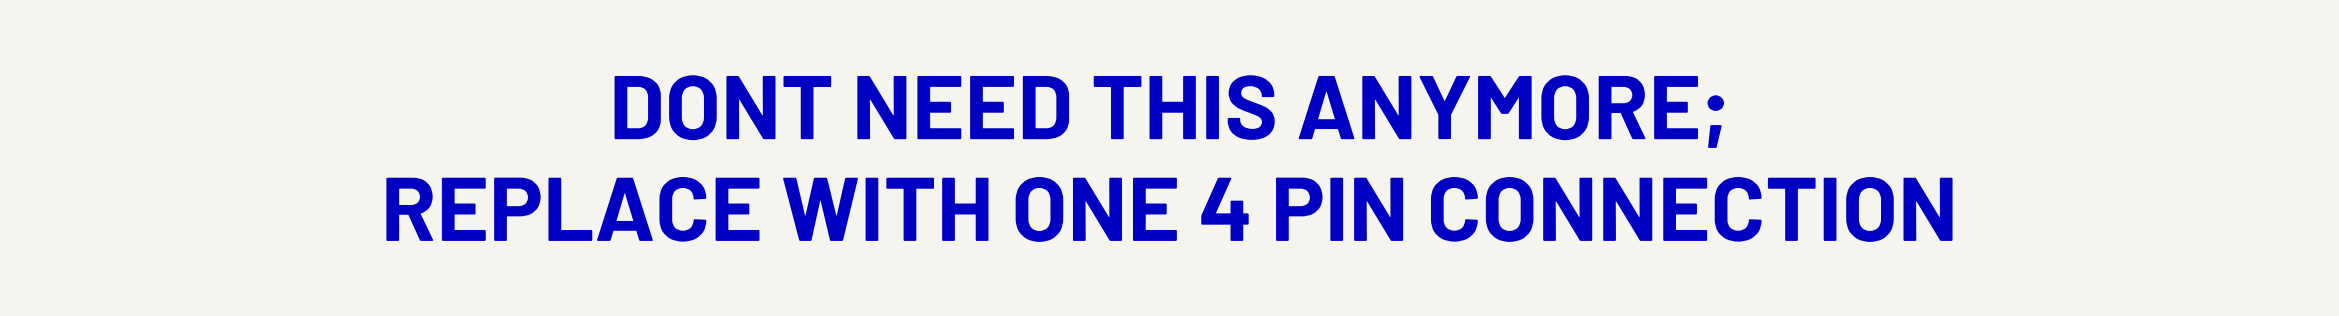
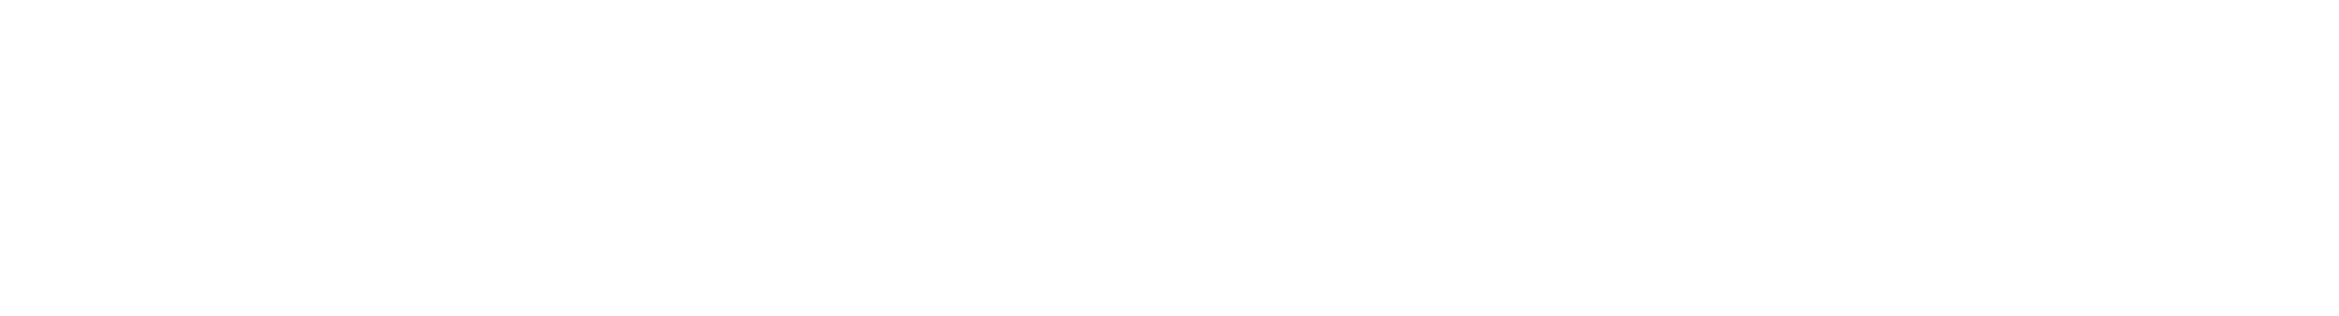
text: DONT NEED THIS ANYMORE; (1169, 111) -> none
text: REPLACE WITH ONE 4 PIN CONNECTION (1169, 209) -> none

